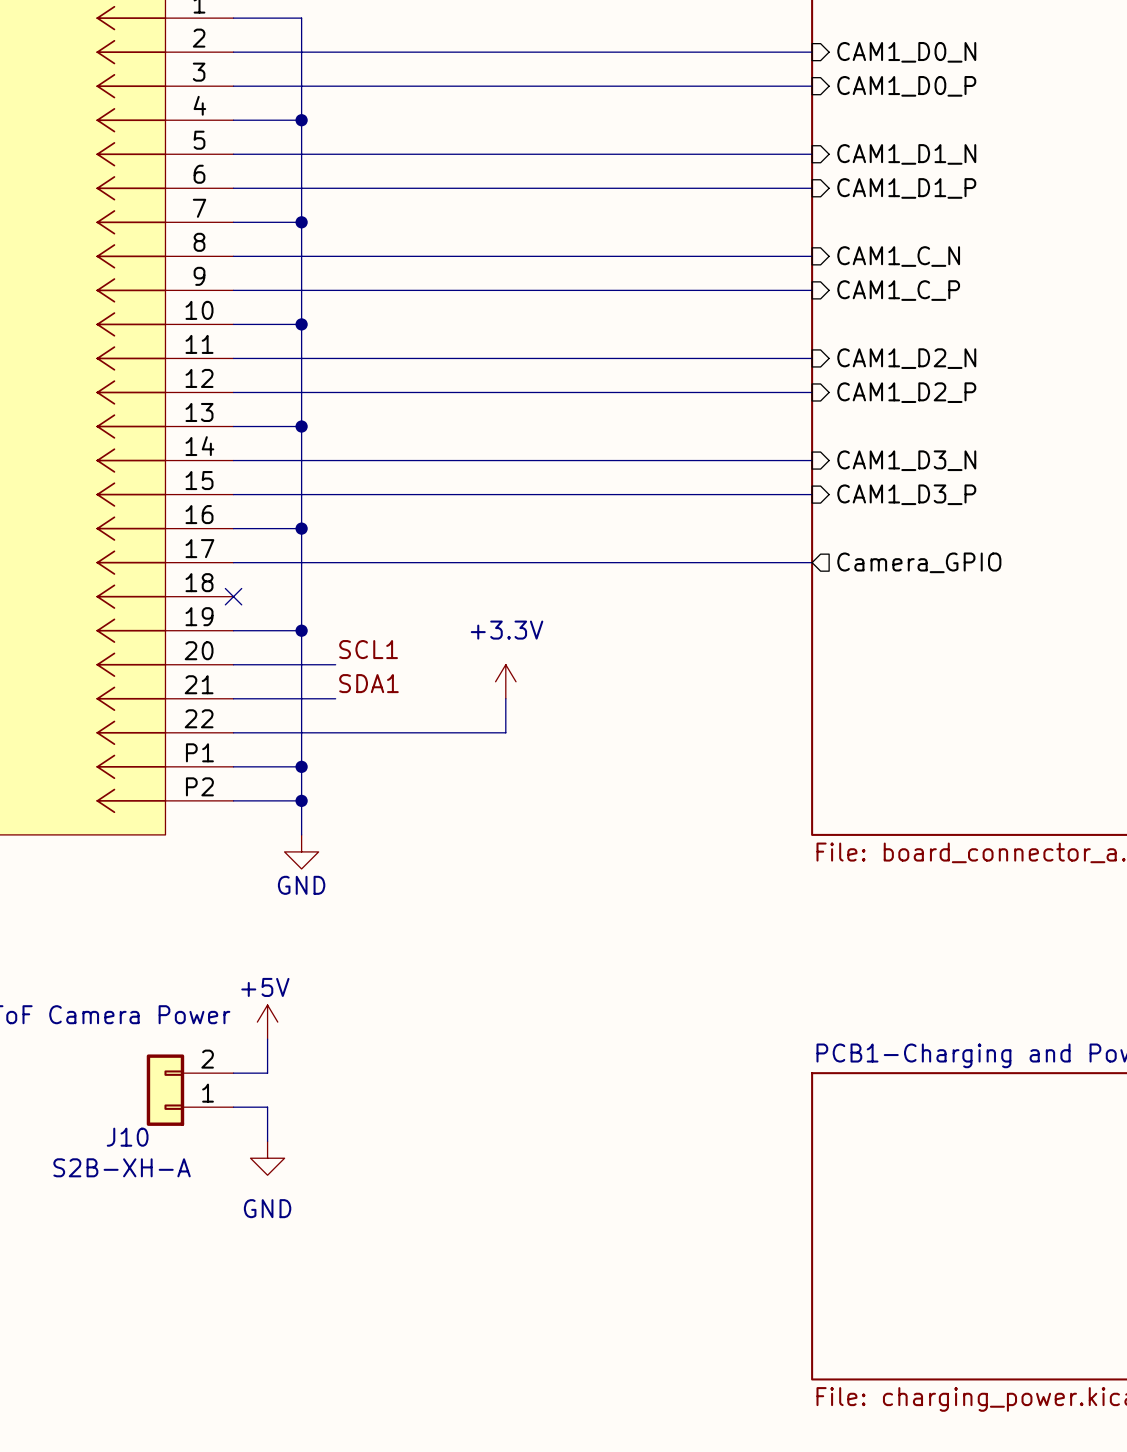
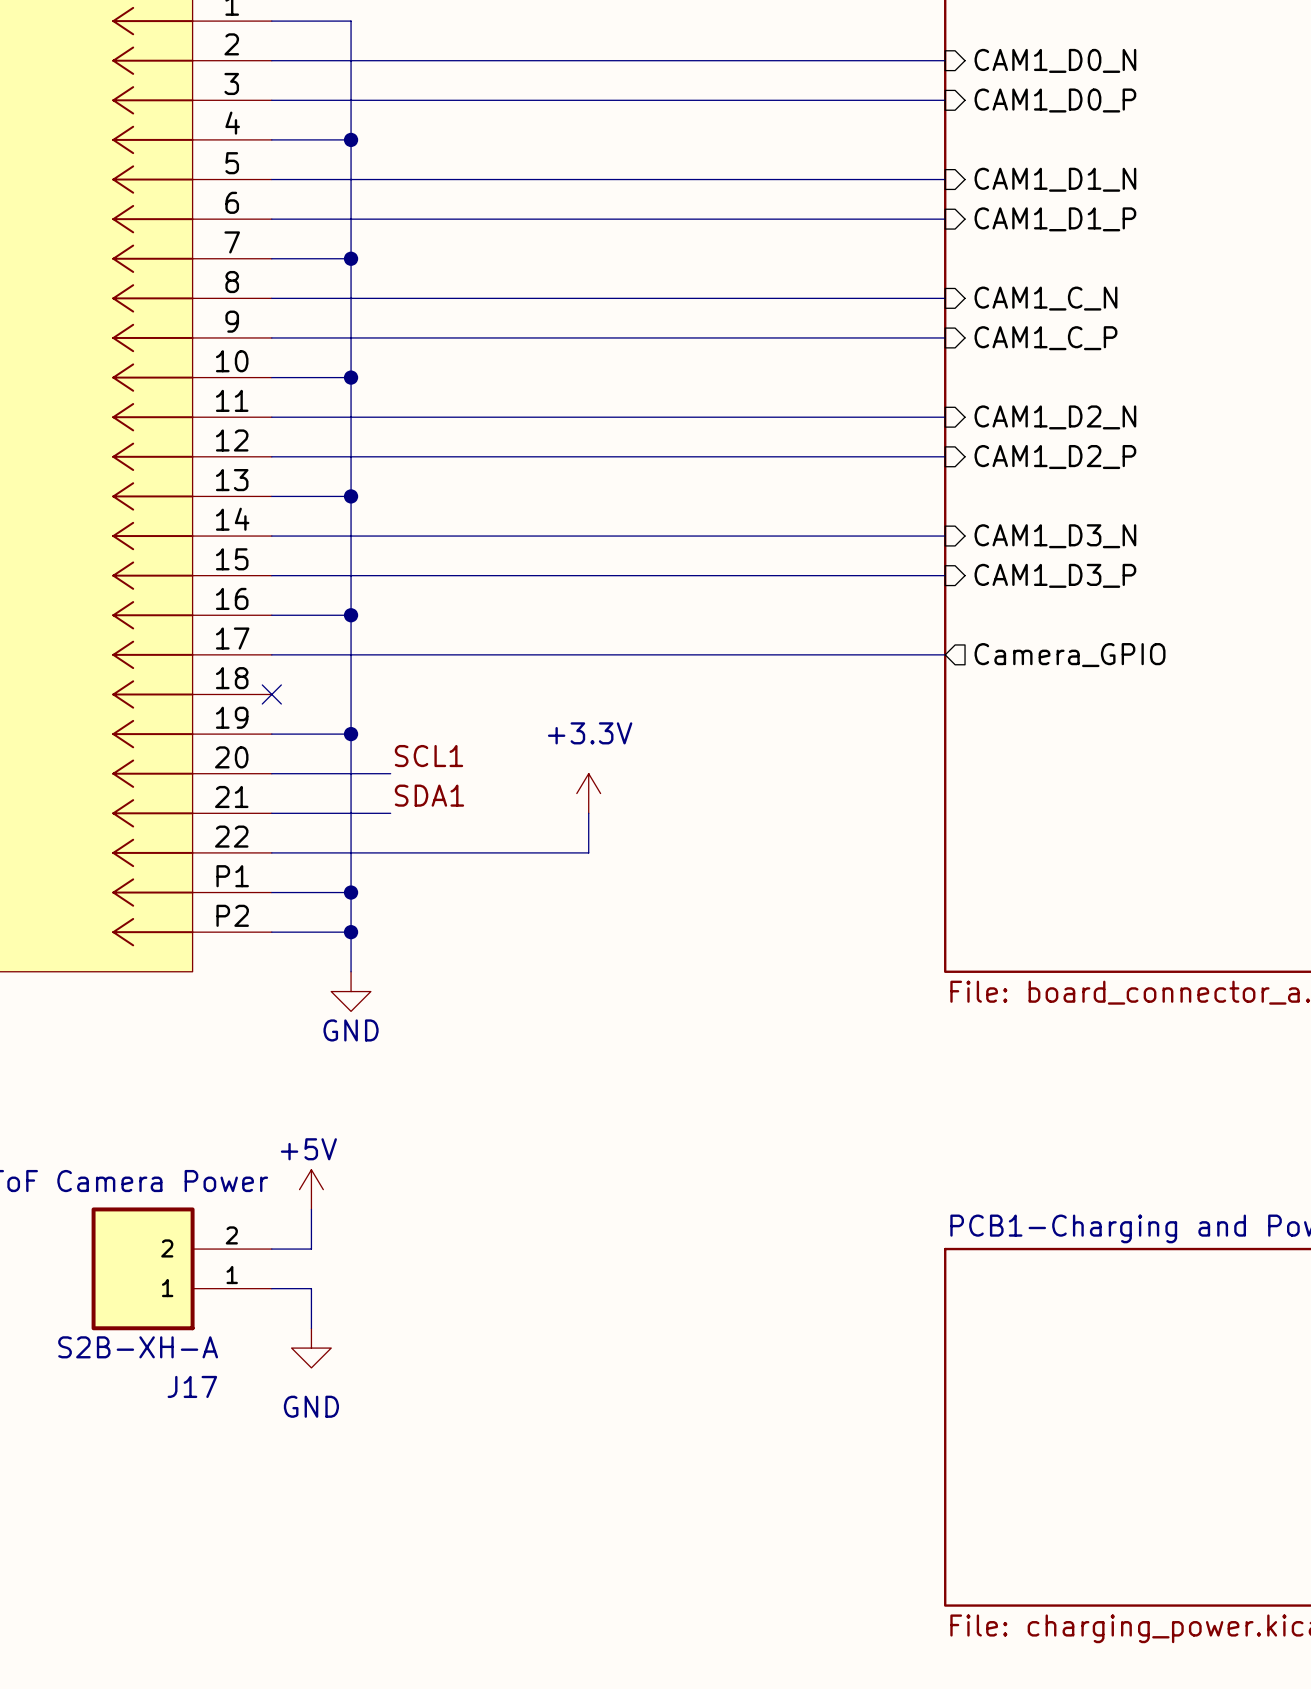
J17: none -> S2B-XH-A (181, 1268)
J10: S2B-XH-A (190, 1090) -> none

